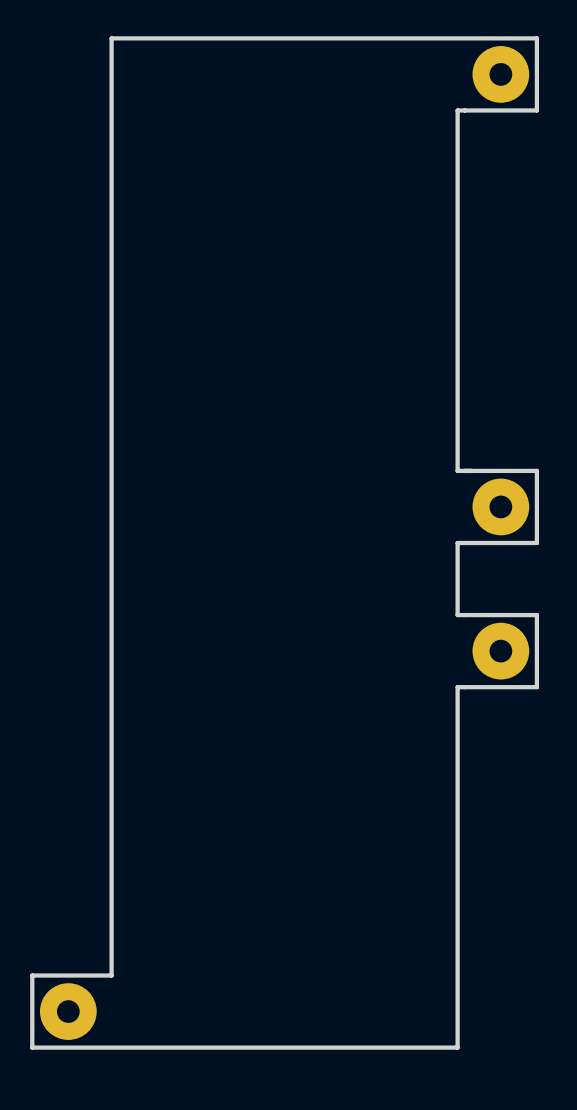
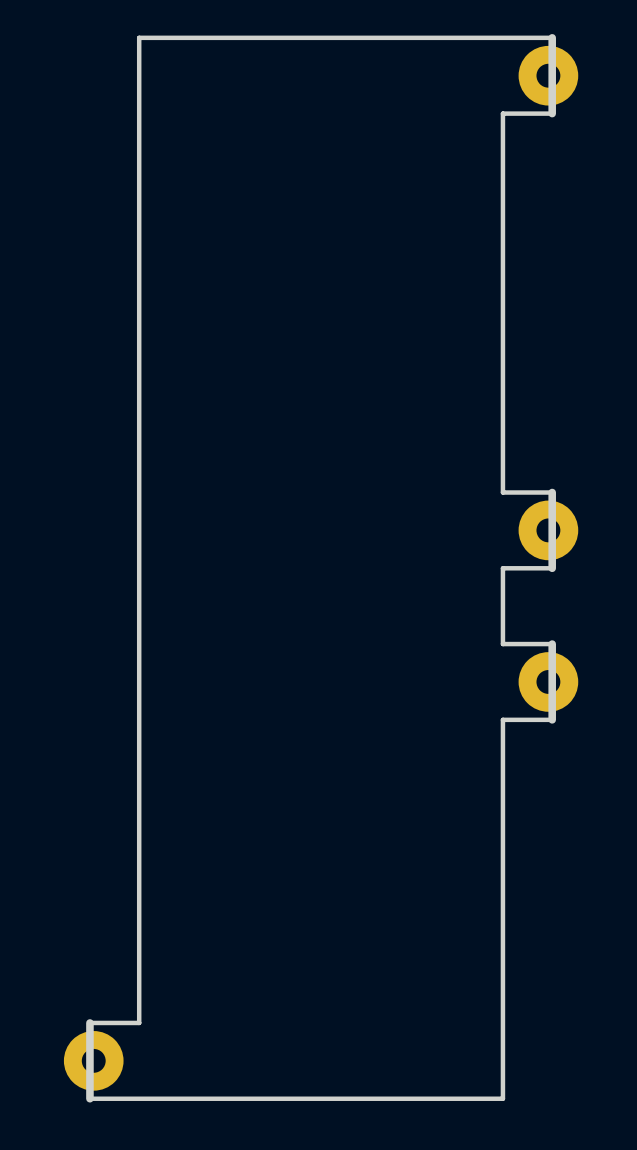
board edge: (504, 38) (536, 38) (536, 110) (504, 110) -> (552, 37) (552, 113)
board edge: (504, 470) (536, 470) (536, 542) (504, 542) -> (552, 492) (552, 568)
board edge: (504, 615) (536, 615) (536, 687) (504, 687) -> (552, 644) (552, 719)
board edge: (64, 975) (32, 975) (32, 1047) (64, 1047) -> (89, 1022) (89, 1098)

